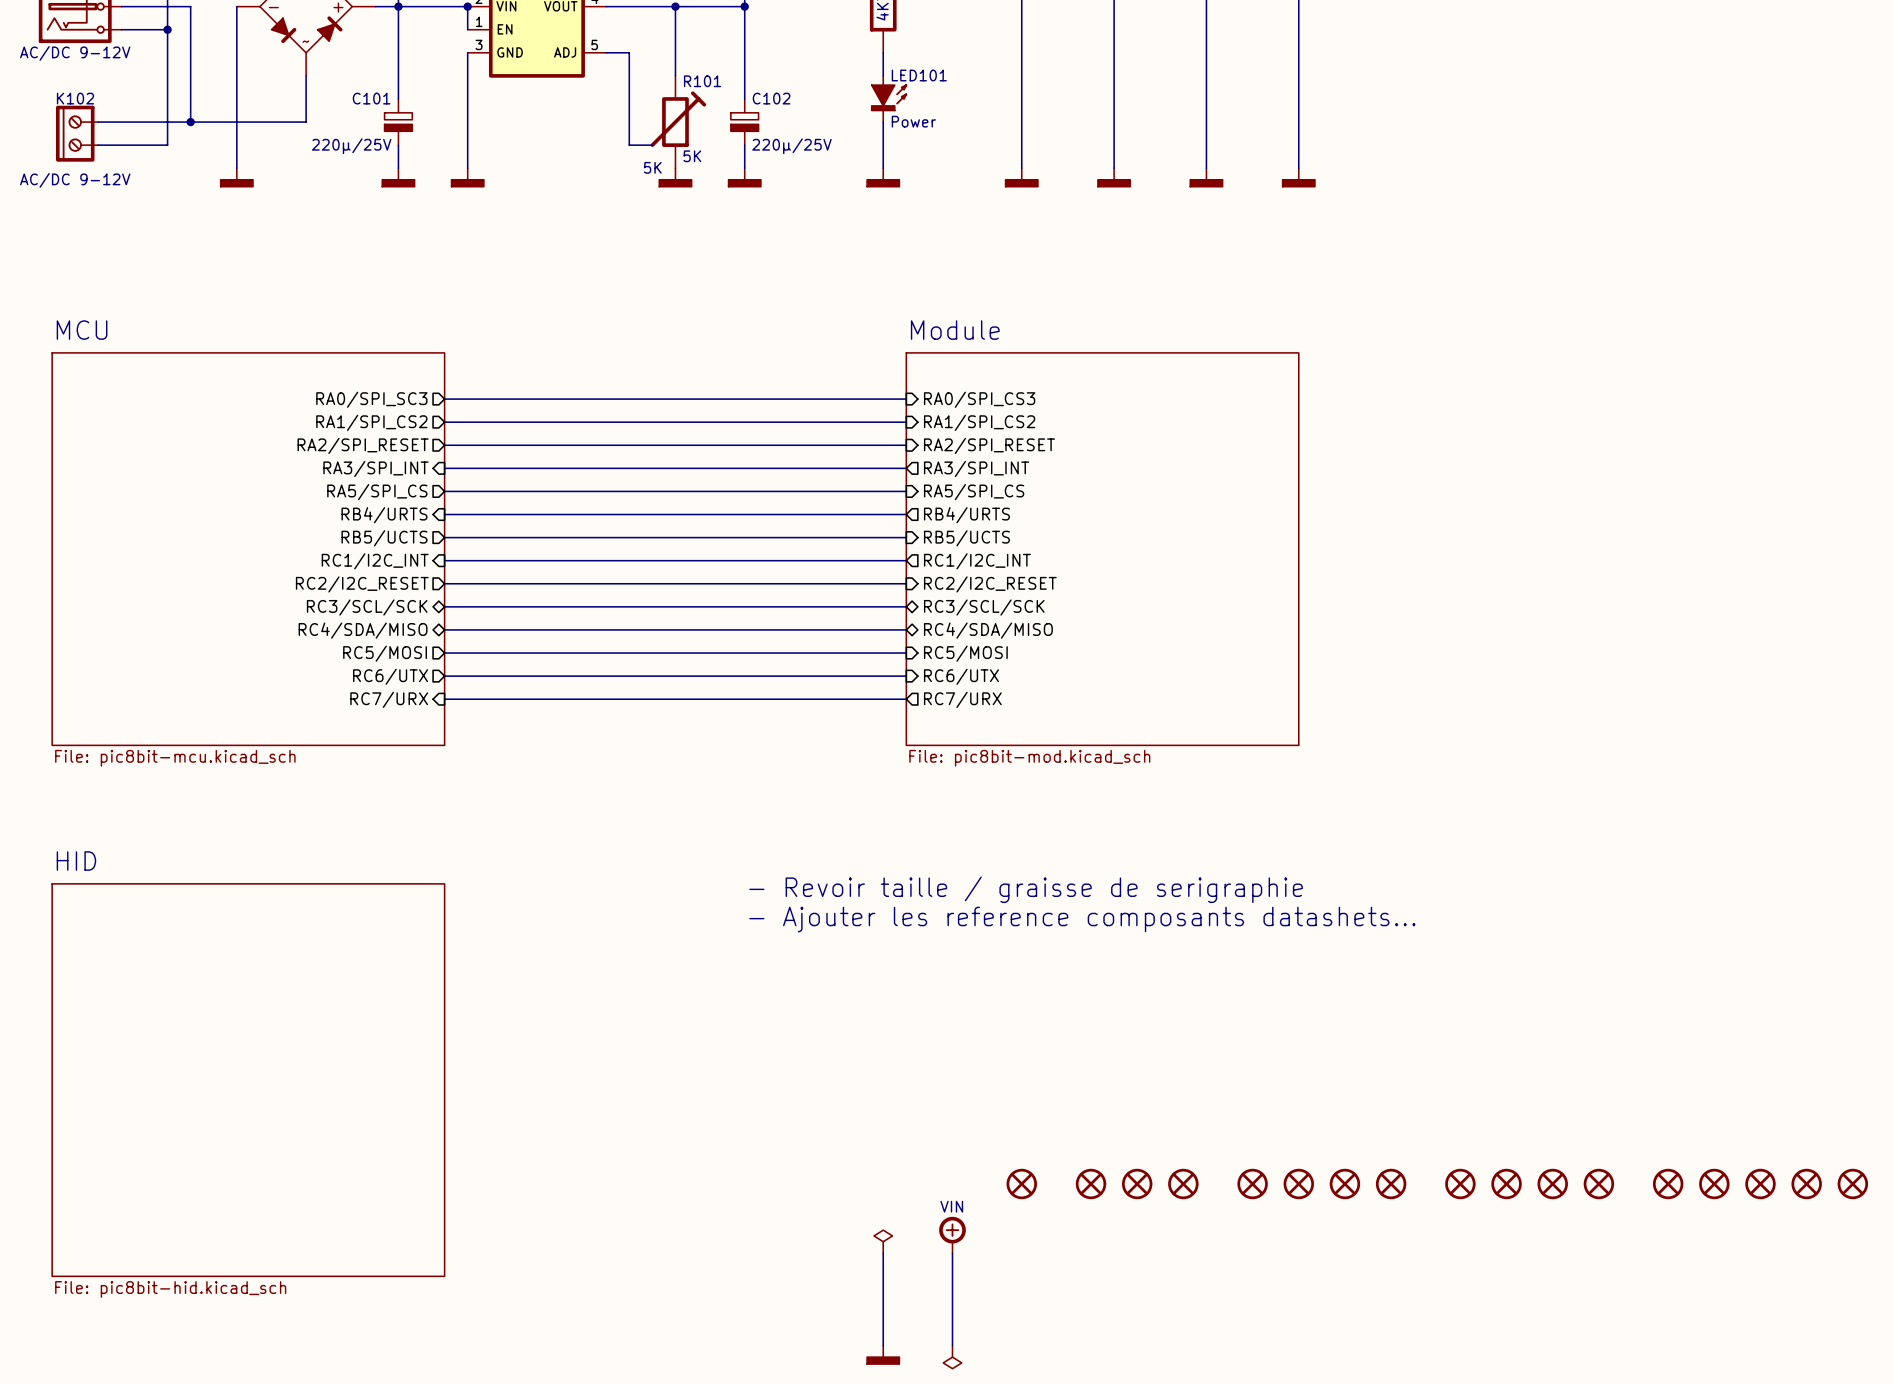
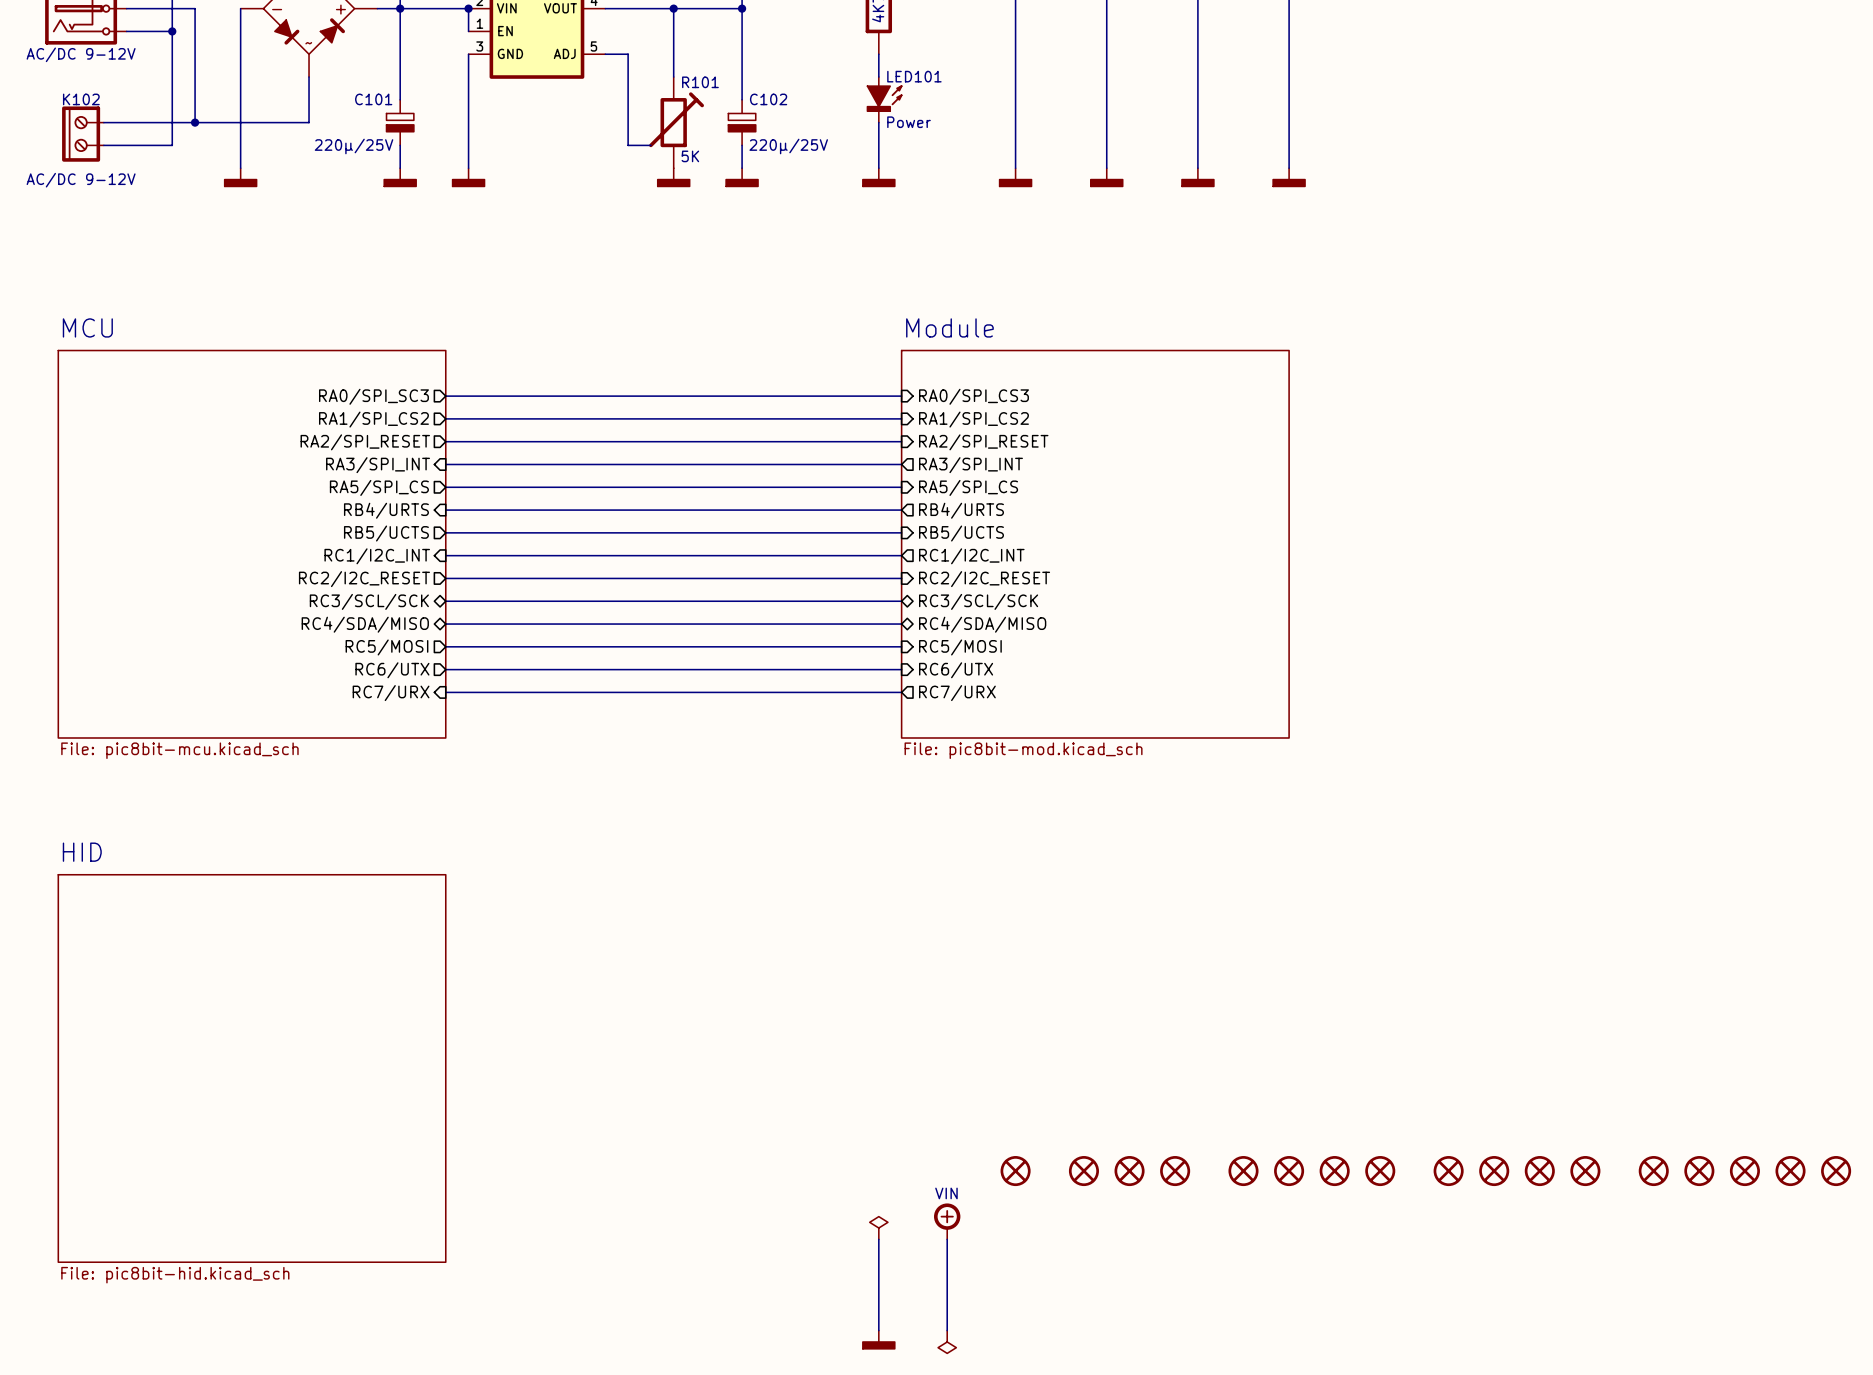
R101 text: 5K (652, 167) -> none
text: - Revoir taille / graisse de serigraphie (1026, 889) -> none
text: - Ajouter les reference composants datashets... (1082, 919) -> none

